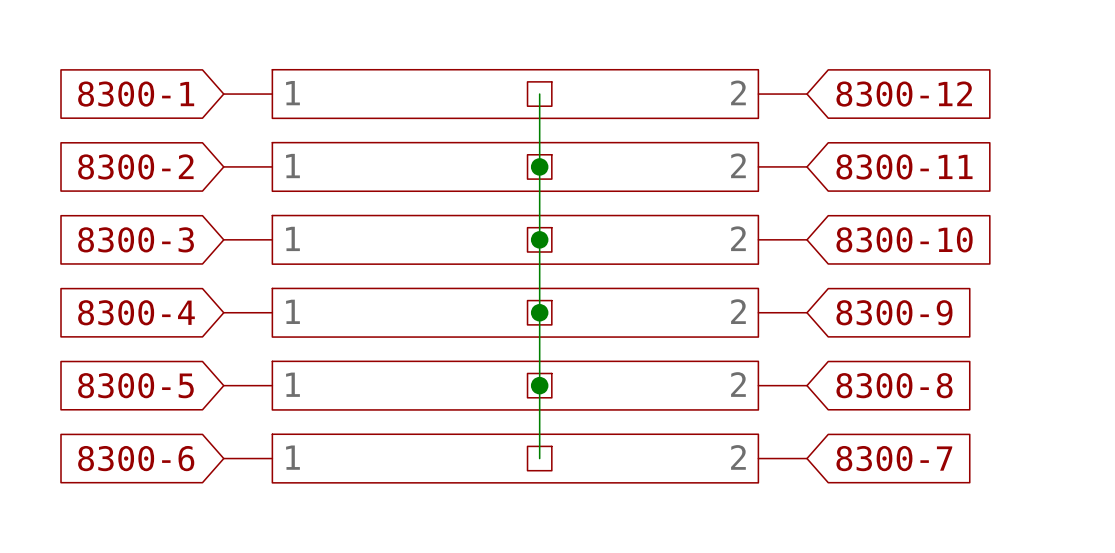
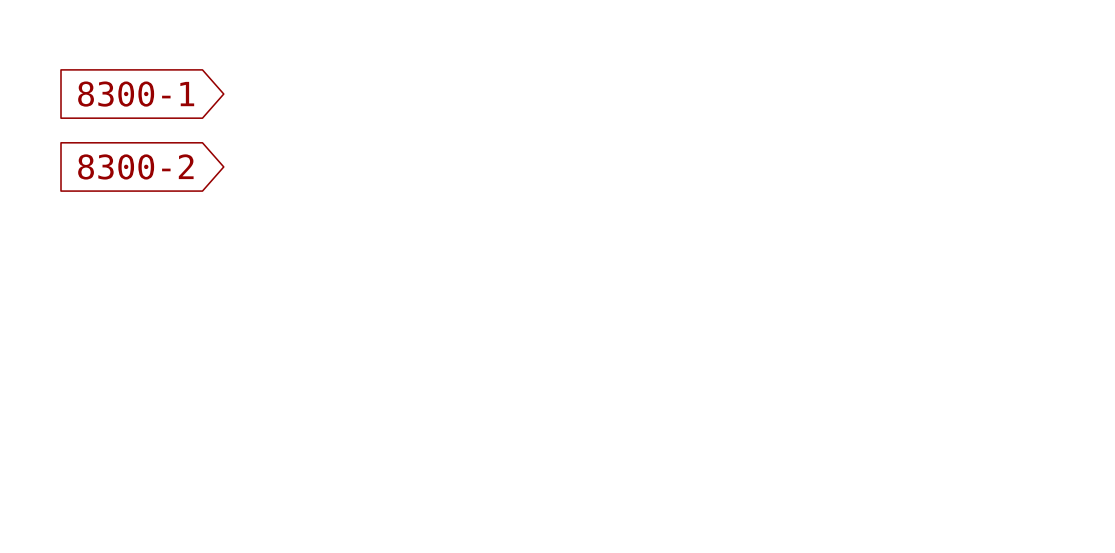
part: (515, 94) -> none
wire: (539, 94) (539, 458) -> none
global label: 8300-12 (904, 94) -> none
part: (515, 166) -> none
junction: (539, 166) -> none
global label: 8300-11 (904, 166) -> none
global label: 8300-3 (136, 239) -> none
part: (515, 239) -> none
junction: (539, 239) -> none
global label: 8300-10 (904, 239) -> none
global label: 8300-4 (136, 312) -> none
part: (515, 312) -> none
junction: (539, 312) -> none
global label: 8300-9 (894, 312) -> none
global label: 8300-5 (135, 385) -> none
part: (515, 385) -> none
junction: (539, 385) -> none
global label: 8300-8 (894, 385) -> none
global label: 8300-6 (136, 458) -> none
part: (515, 458) -> none
global label: 8300-7 (894, 458) -> none

